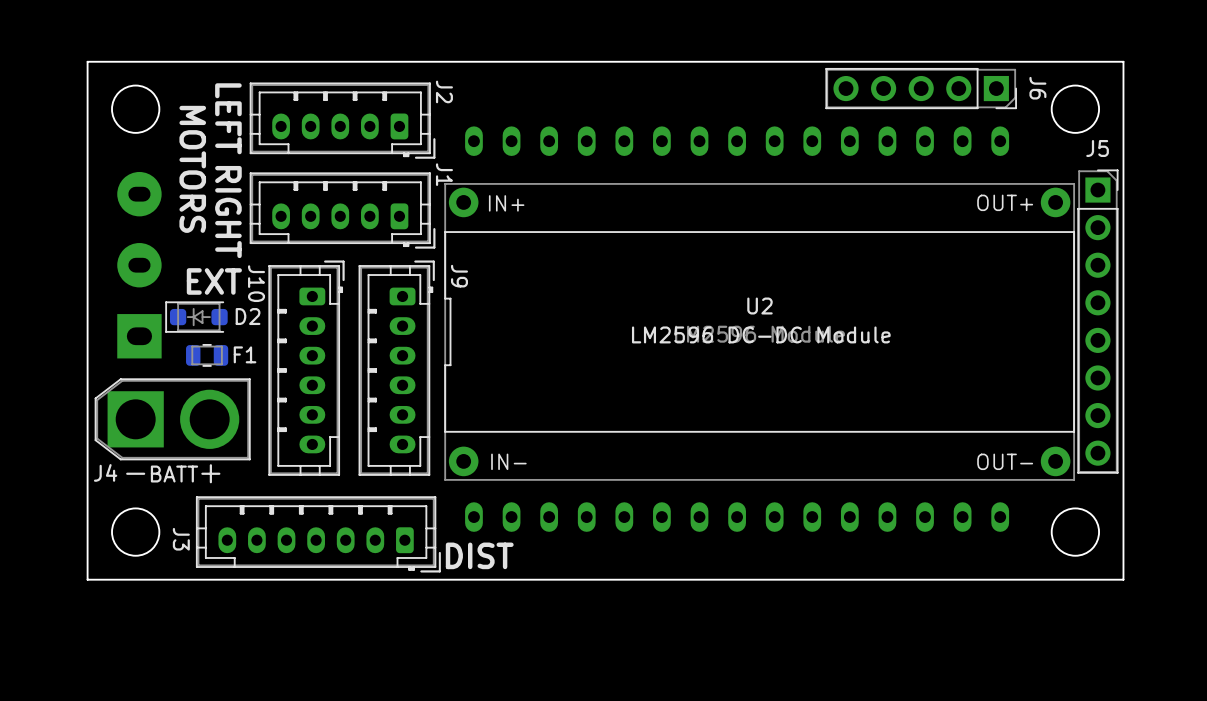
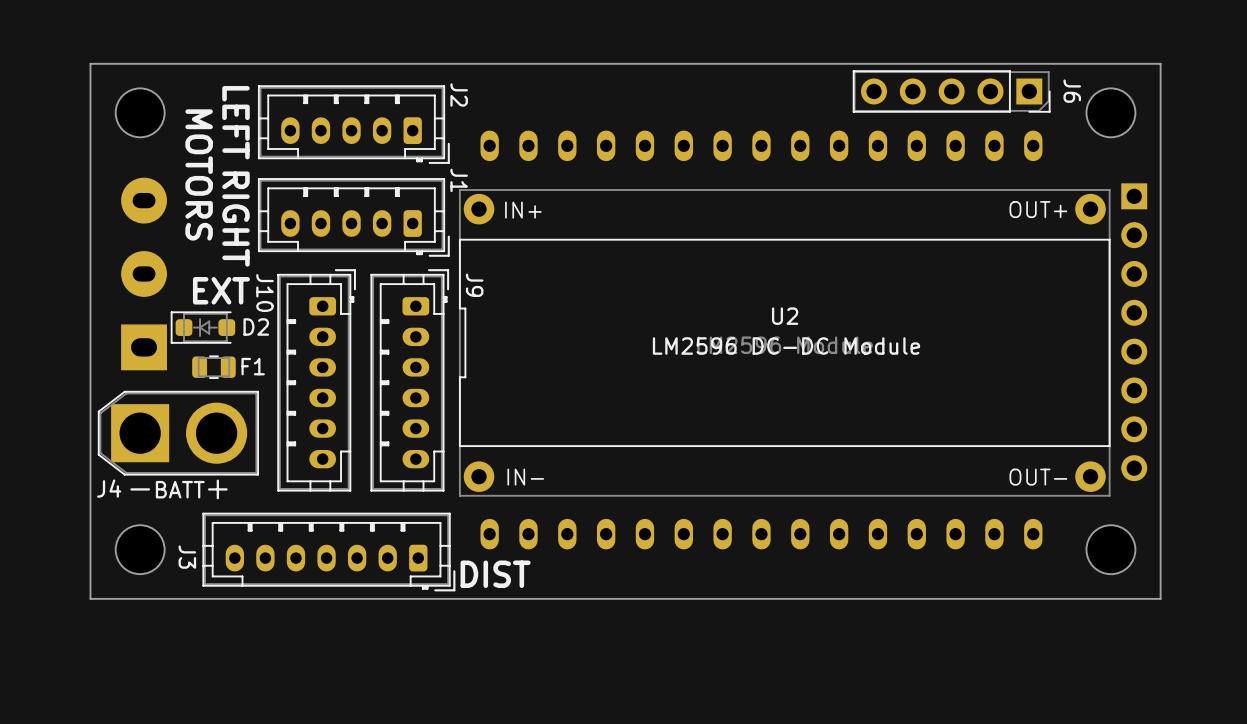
J5 side: bottom (1097, 321) -> top (1134, 332)

